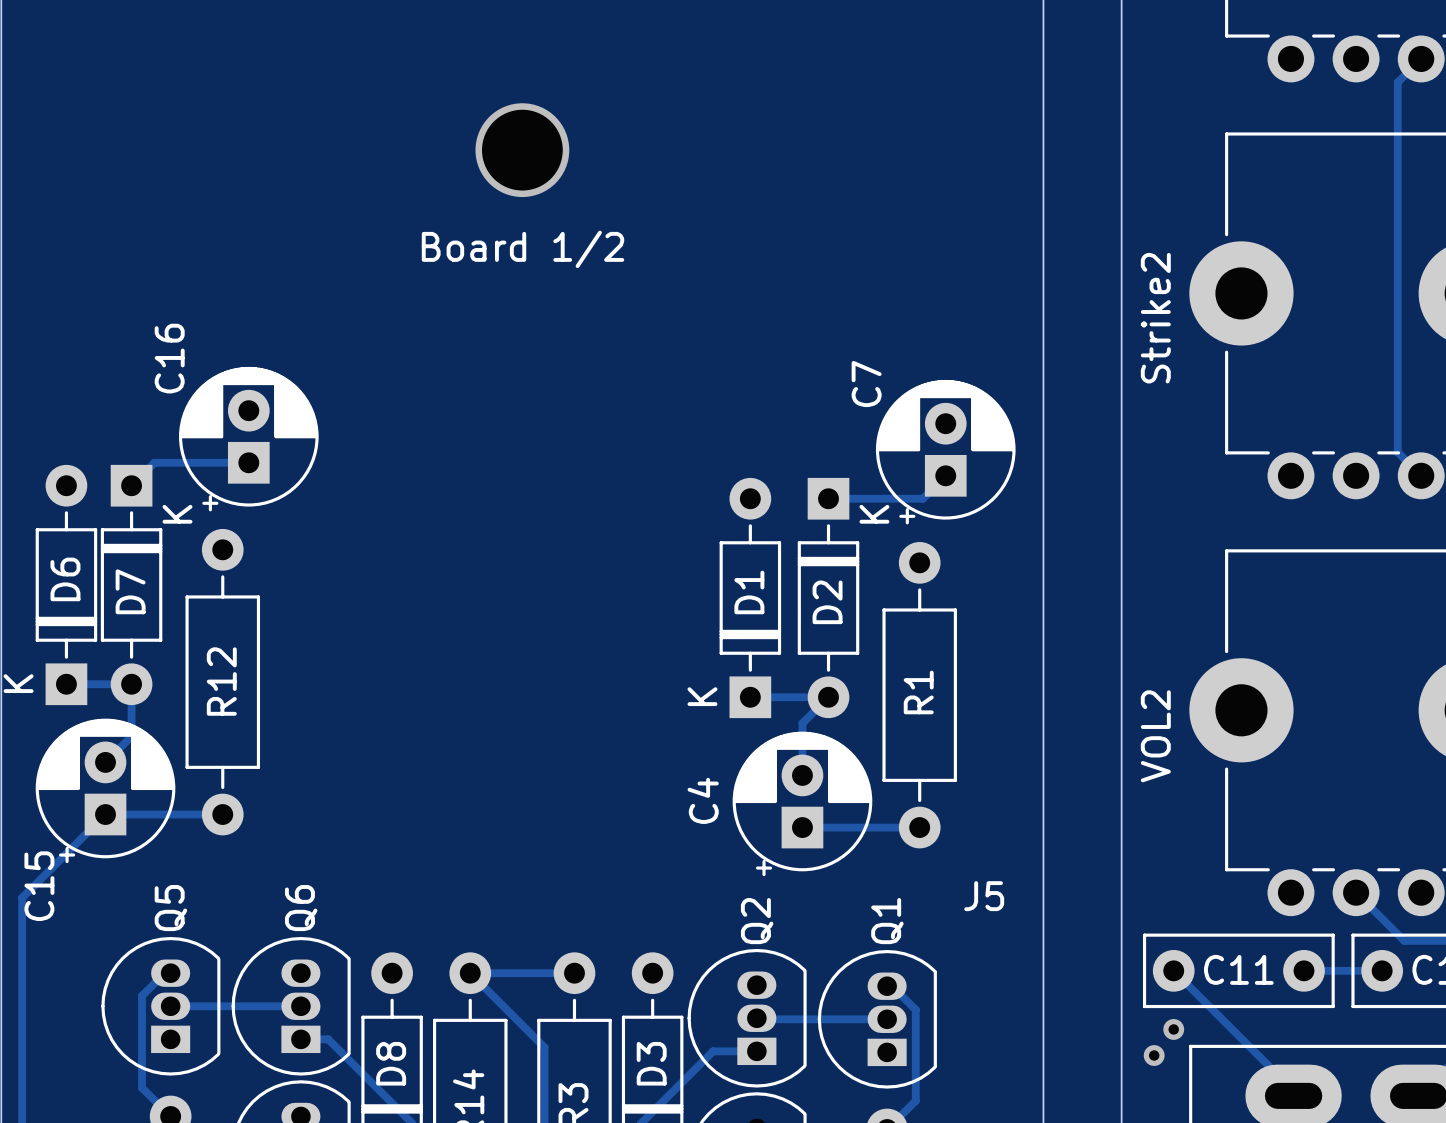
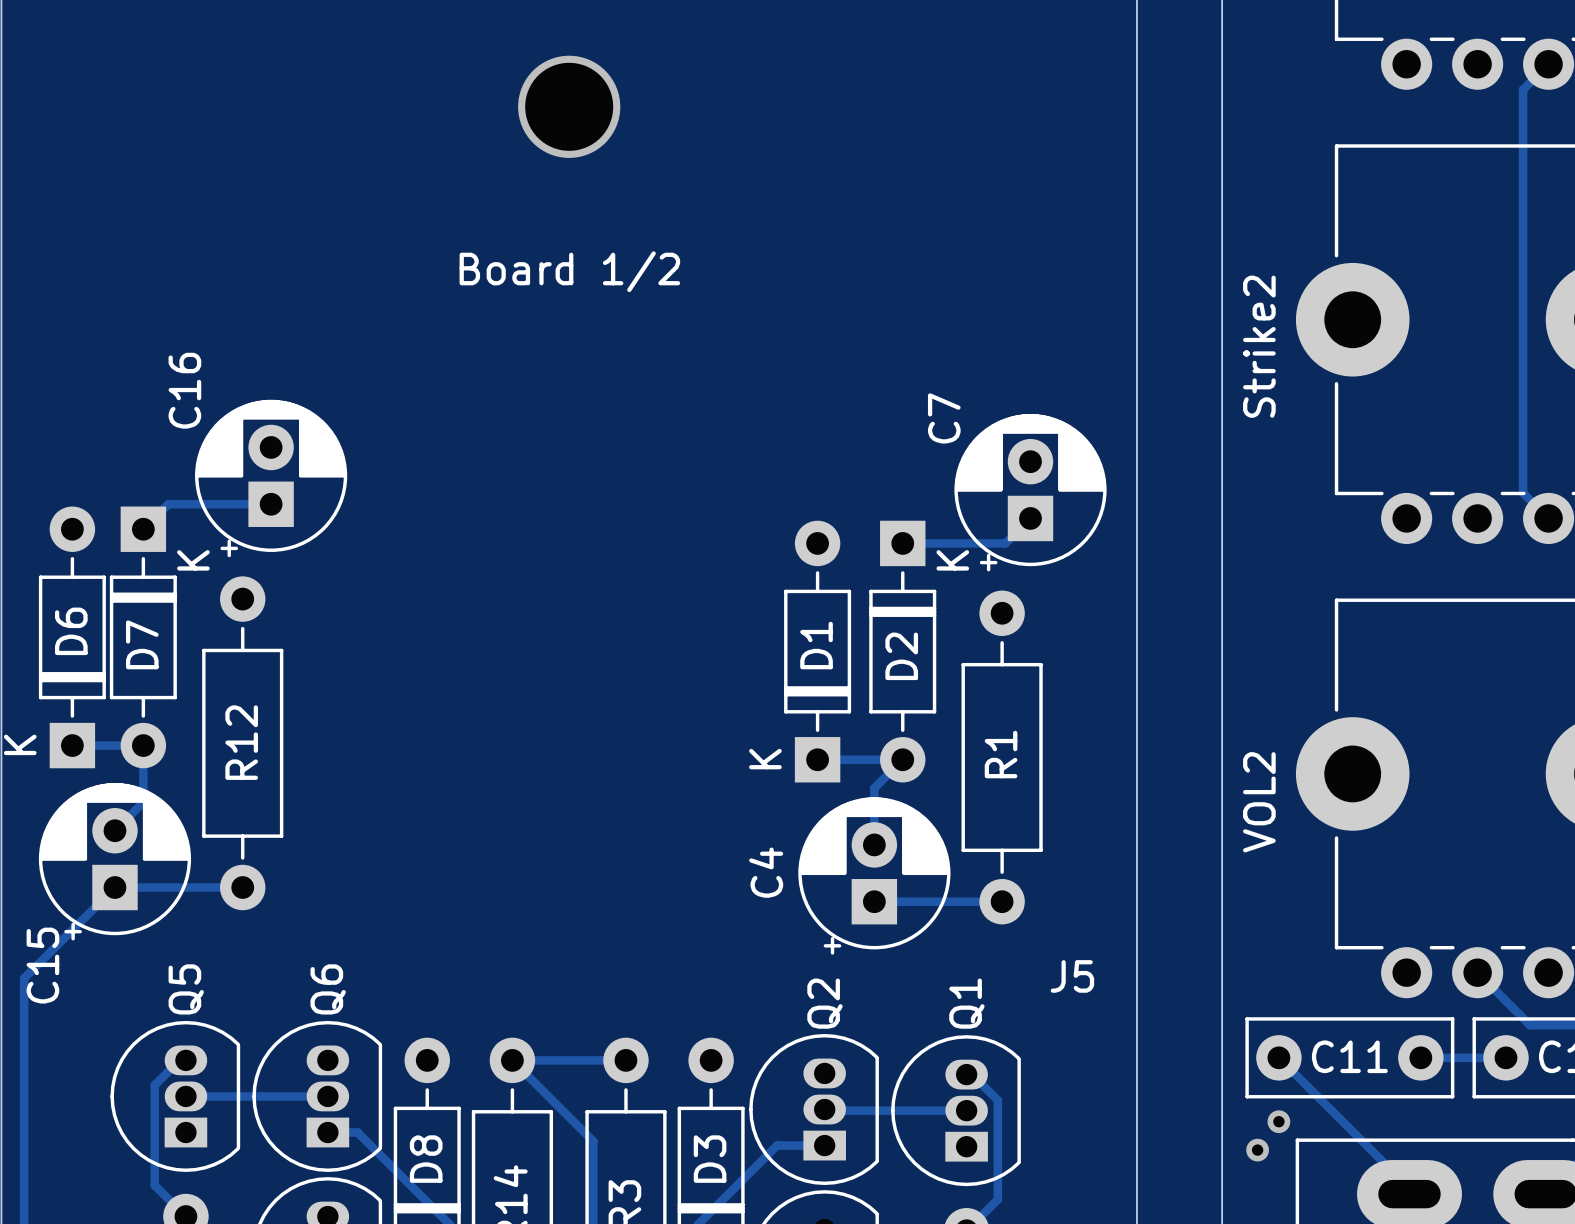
via position: (522, 150) -> (569, 106)

